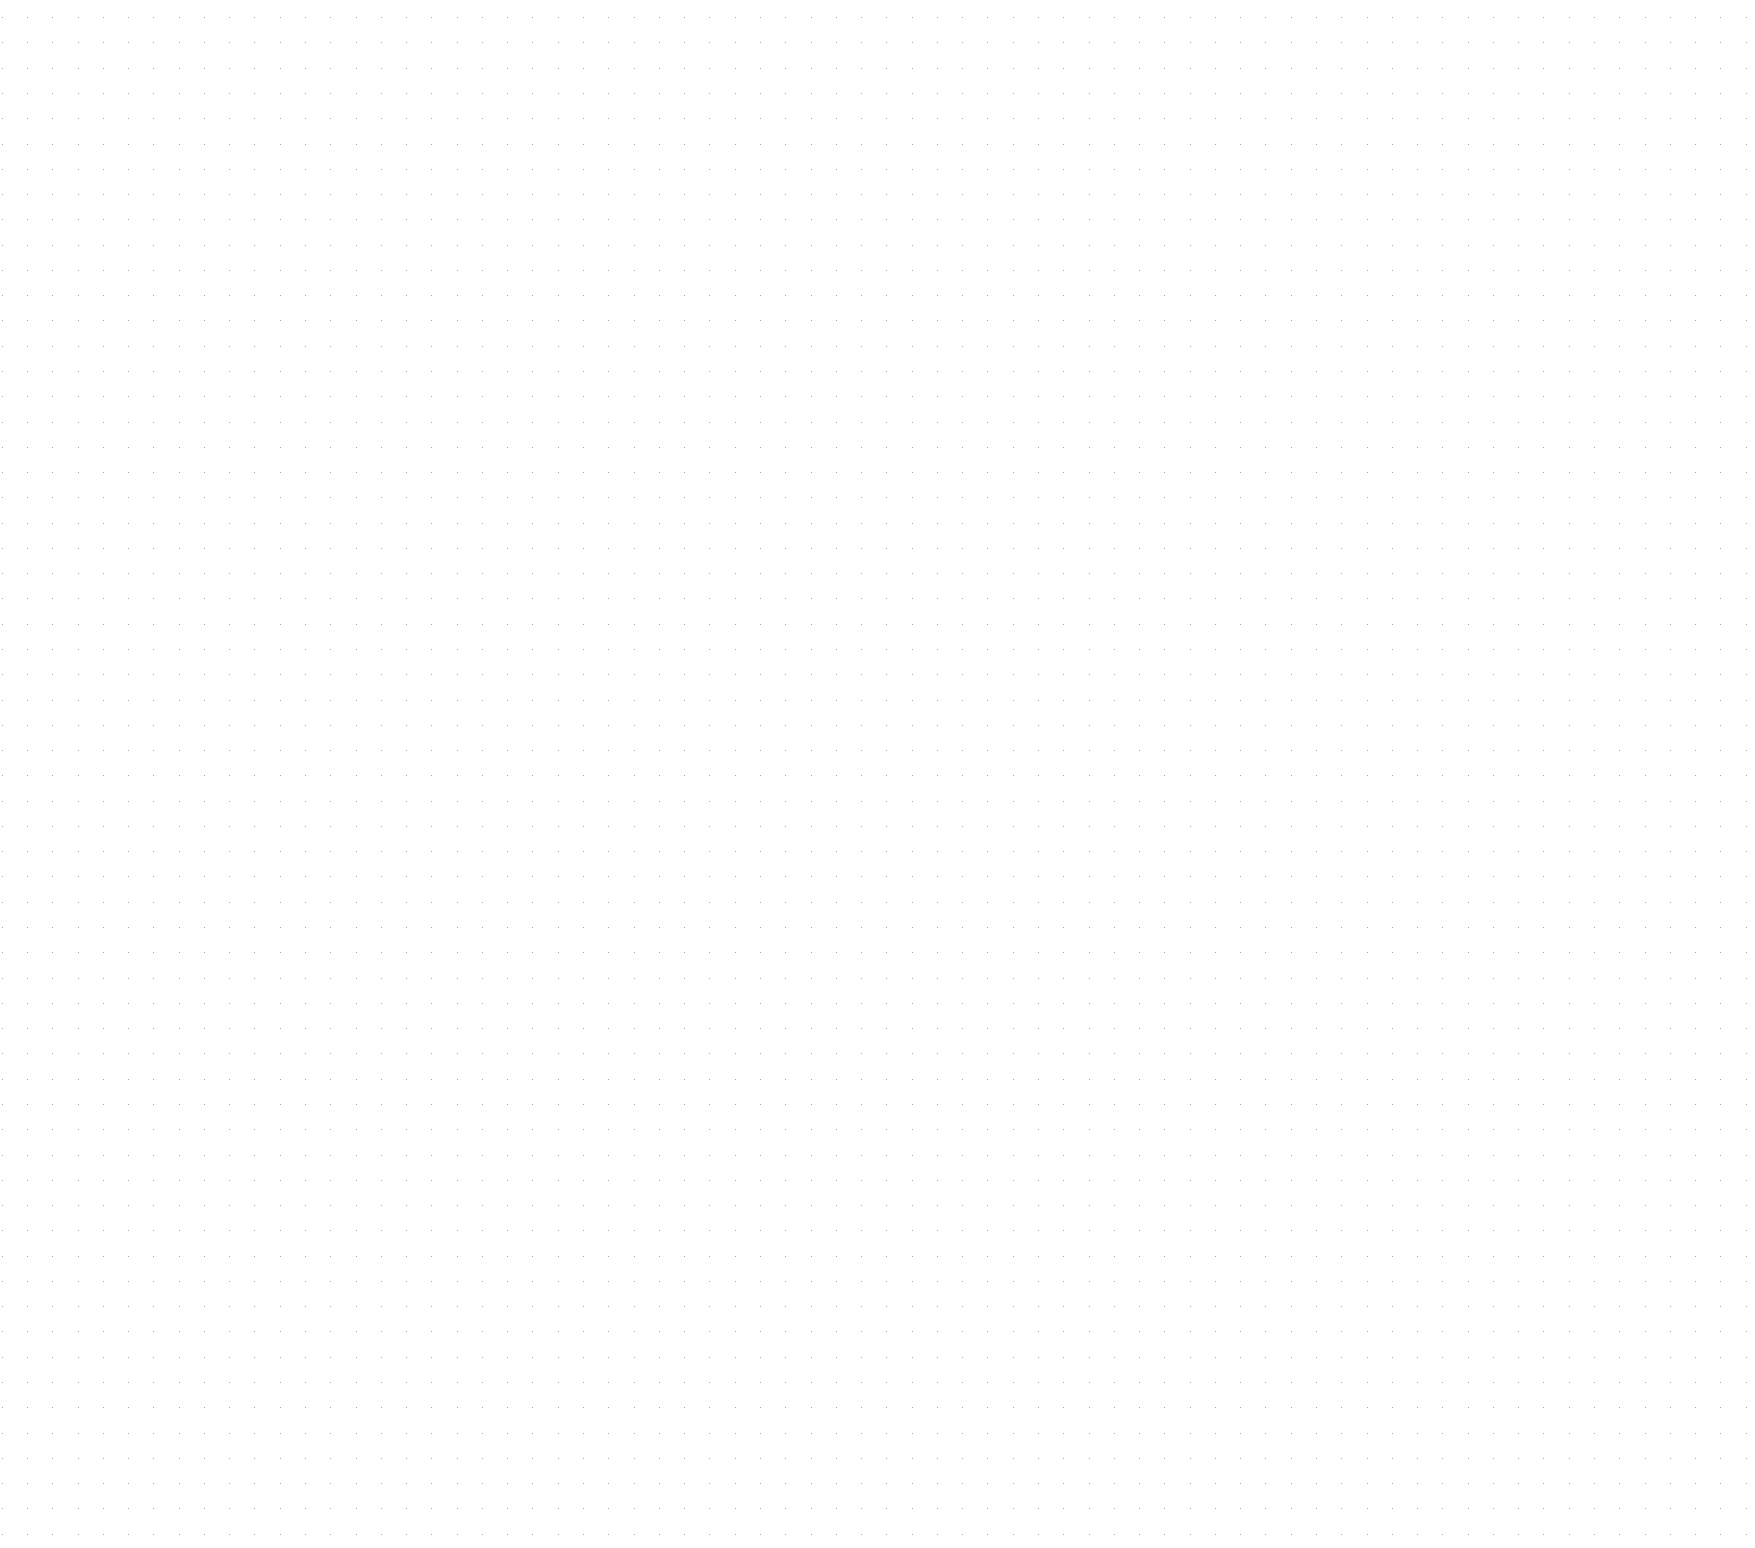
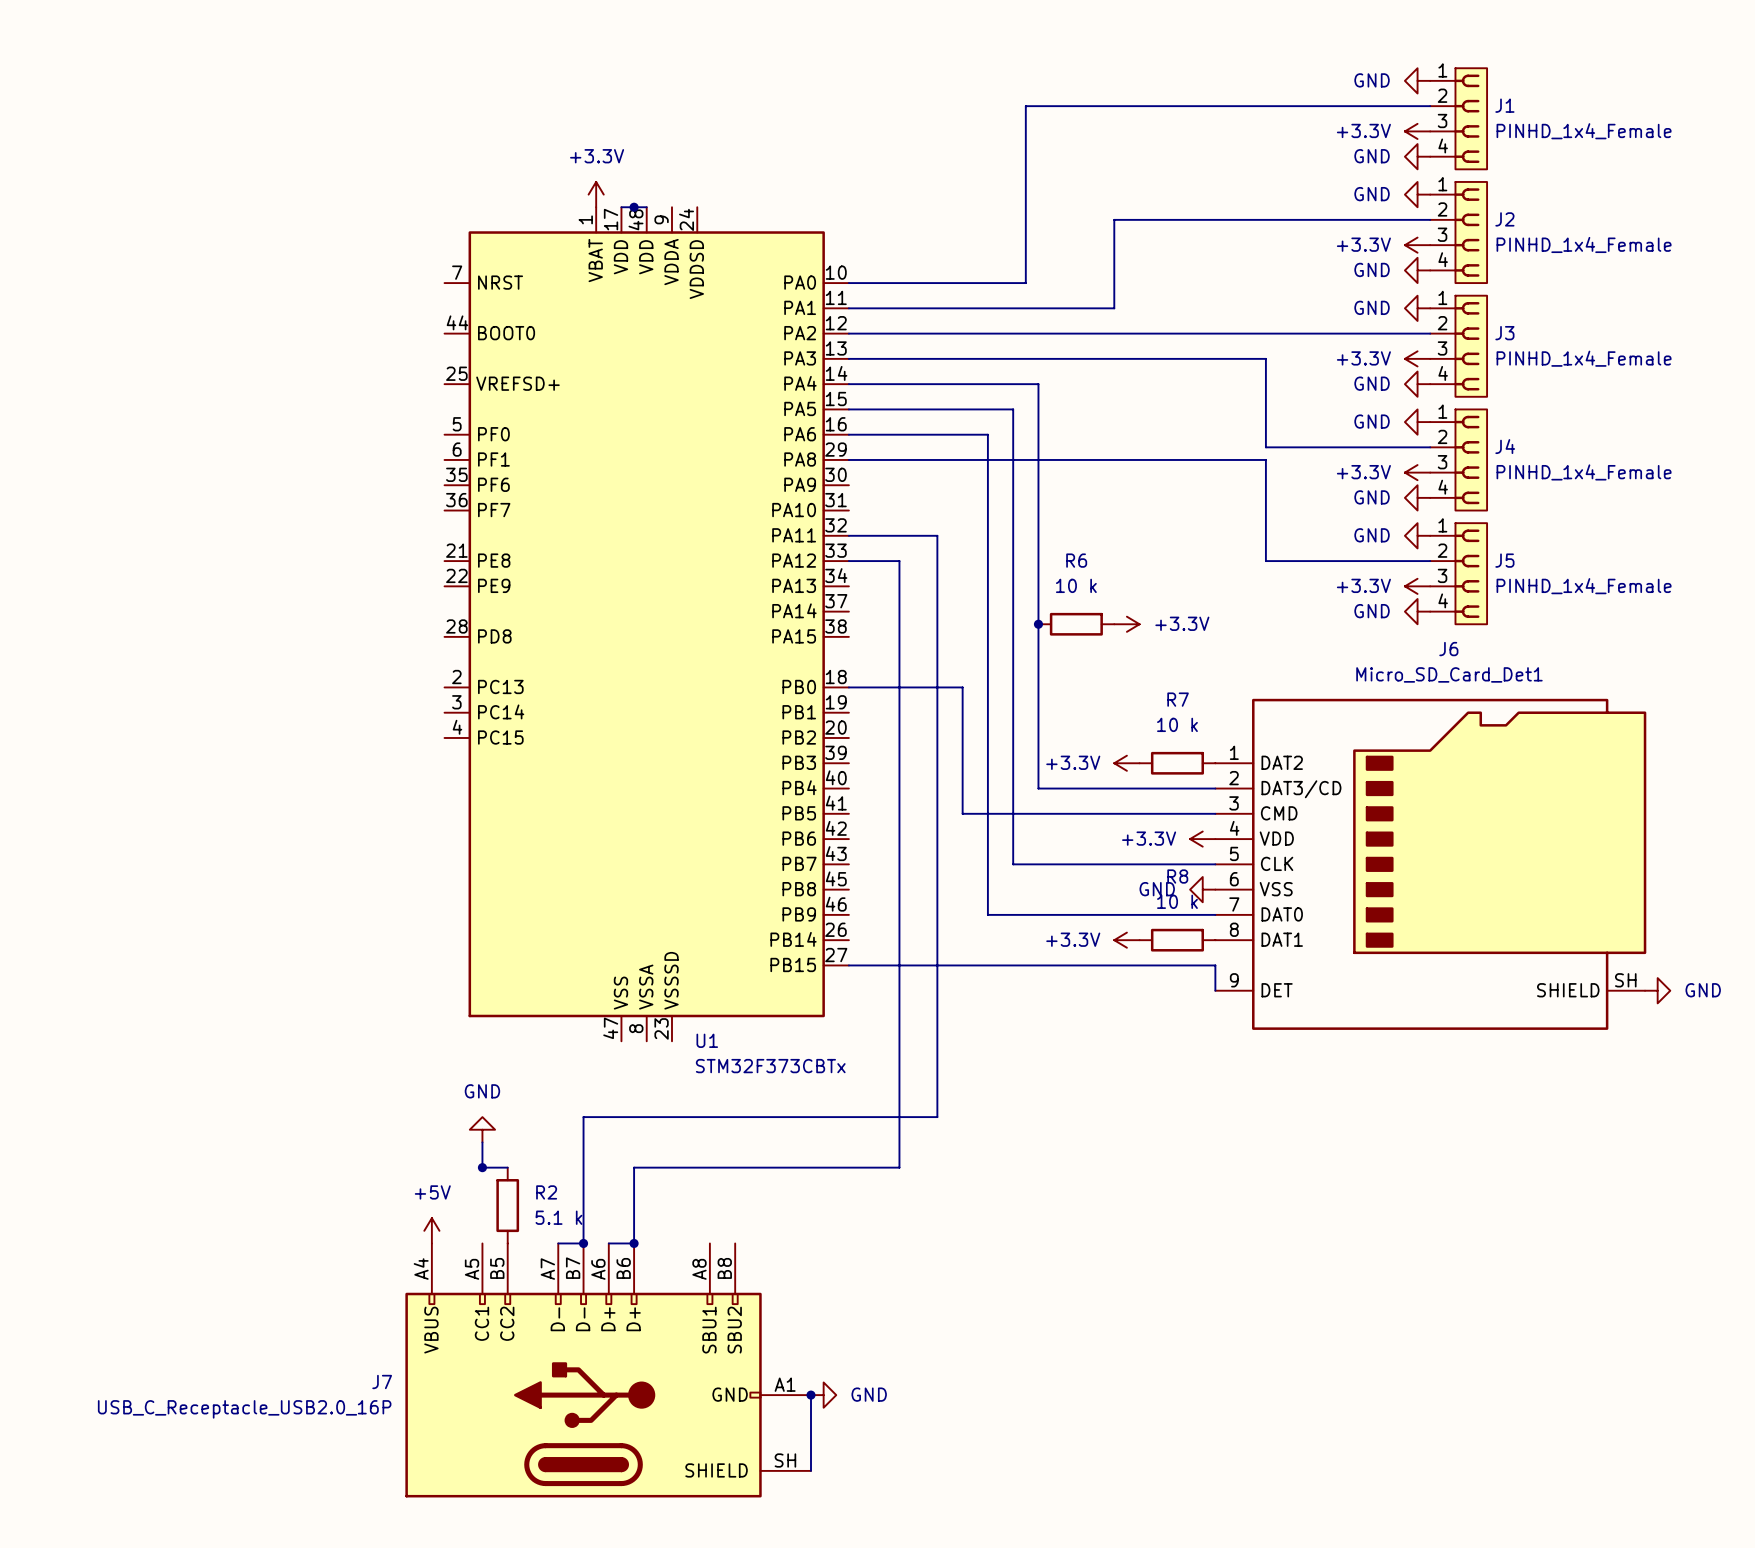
power symbol: none -> GND (1417, 80)
wire: none -> (1430, 106) (1025, 106) (1025, 283) (848, 283)
J1: none -> PINHD_1x4_Female (1458, 118)
power symbol: none -> +3.3V (1417, 131)
power symbol: none -> GND (1417, 156)
power symbol: none -> +3.3V (596, 194)
power symbol: none -> GND (1417, 194)
wire: none -> (621, 207) (646, 207)
junction: none -> (634, 207)
wire: none -> (1430, 219) (1114, 219) (1114, 308) (848, 308)
J2: none -> PINHD_1x4_Female (1458, 232)
power symbol: none -> +3.3V (1417, 245)
power symbol: none -> GND (1417, 270)
power symbol: none -> GND (1417, 308)
wire: none -> (848, 333) (1430, 333)
J3: none -> PINHD_1x4_Female (1458, 346)
wire: none -> (848, 358) (1265, 358) (1265, 447) (1430, 447)
power symbol: none -> +3.3V (1417, 358)
wire: none -> (848, 384) (1038, 384) (1038, 788) (1215, 788)
power symbol: none -> GND (1417, 384)
wire: none -> (848, 409) (1013, 409) (1013, 864) (1215, 864)
power symbol: none -> GND (1417, 422)
wire: none -> (848, 434) (987, 434) (987, 914) (1215, 914)
wire: none -> (848, 459) (1265, 459) (1265, 561) (1430, 561)
J4: none -> PINHD_1x4_Female (1458, 459)
power symbol: none -> +3.3V (1417, 472)
power symbol: none -> GND (1417, 497)
wire: none -> (848, 535) (937, 535) (937, 1117) (583, 1117) (583, 1243) (558, 1243)
power symbol: none -> GND (1417, 535)
wire: none -> (848, 561) (899, 561) (899, 1167) (634, 1167) (634, 1243) (608, 1243)
J5: none -> PINHD_1x4_Female (1458, 573)
power symbol: none -> +3.3V (1417, 586)
power symbol: none -> GND (1417, 611)
U1: none -> STM32F373CBTx (646, 624)
junction: none -> (1038, 624)
R6: none -> 10 k (1076, 624)
power symbol: none -> +3.3V (1126, 624)
wire: none -> (848, 687) (962, 687) (962, 813) (1215, 813)
power symbol: none -> +3.3V (1126, 763)
R7: none -> 10 k (1177, 763)
power symbol: none -> +3.3V (1202, 839)
J6: none -> Micro_SD_Card_Det1 (1430, 864)
power symbol: none -> GND (1202, 889)
power symbol: none -> +3.3V (1126, 940)
R8: none -> 10 k (1177, 940)
wire: none -> (848, 965) (1215, 965) (1215, 990)
power symbol: none -> GND (1657, 990)
power symbol: none -> GND (482, 1129)
wire: none -> (482, 1142) (482, 1167) (507, 1167)
junction: none -> (482, 1167)
R2: none -> 5.1 k (507, 1205)
power symbol: none -> +5V (431, 1230)
junction: none -> (583, 1243)
junction: none -> (634, 1243)
J7: none -> USB_C_Receptacle_USB2.0_16P (608, 1370)
wire: none -> (811, 1395) (811, 1470)
junction: none -> (811, 1395)
power symbol: none -> GND (823, 1395)

